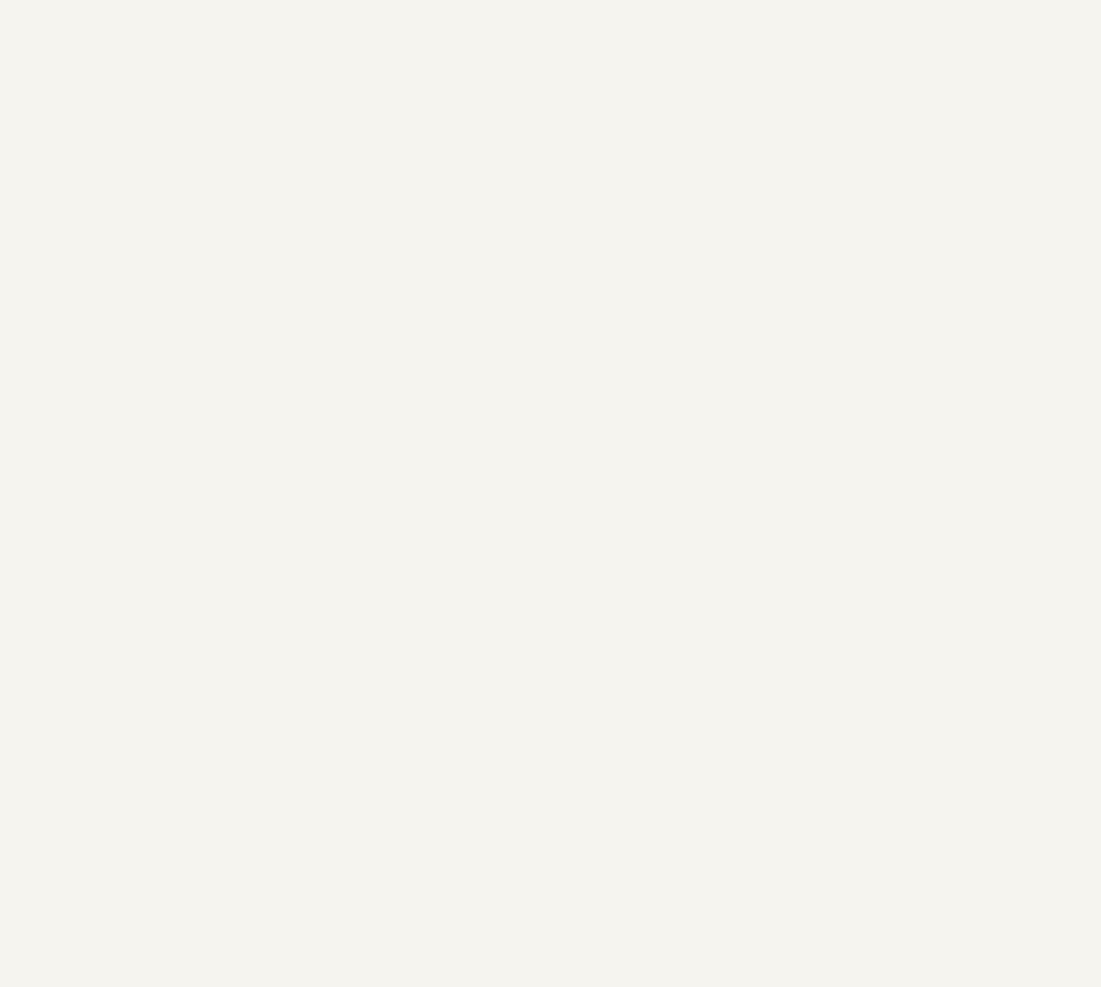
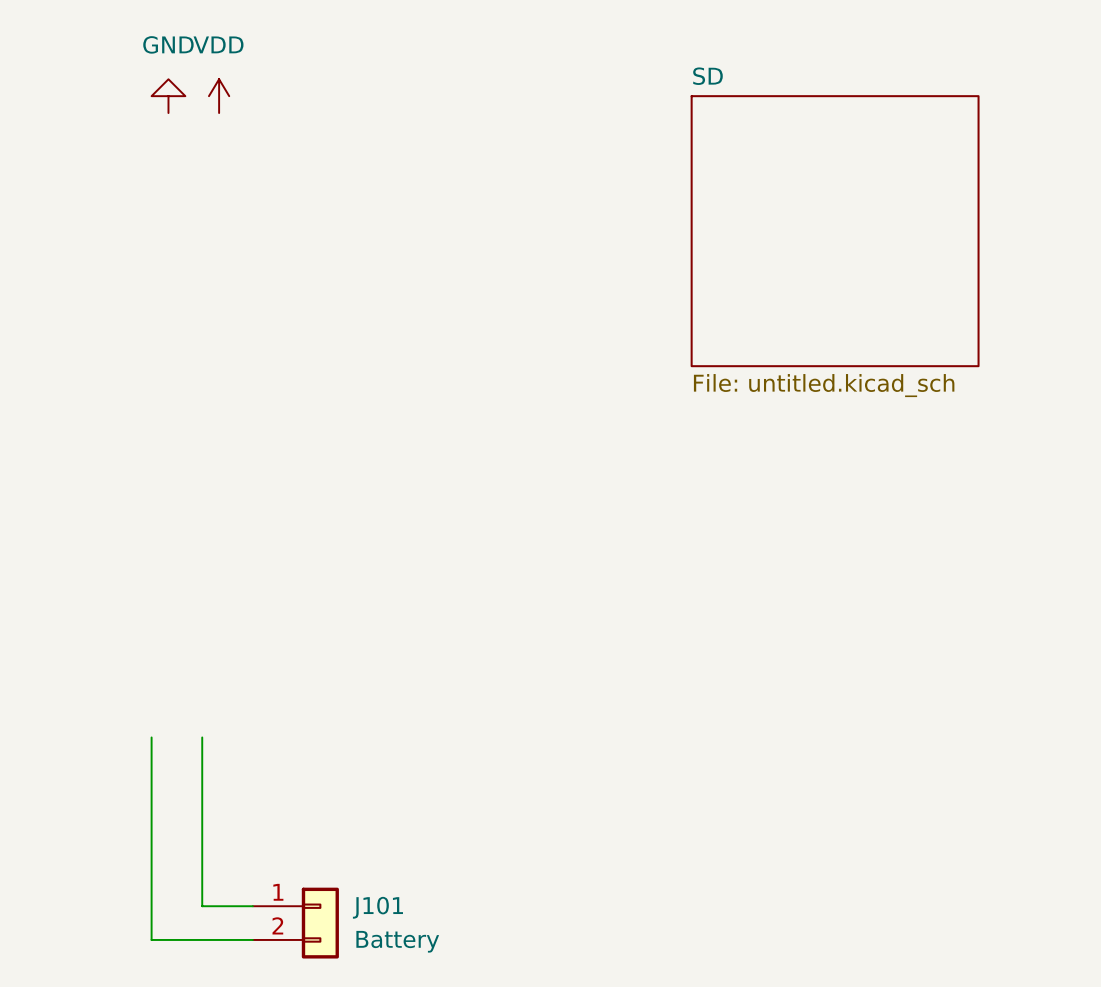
power symbol: none -> GND (168, 96)
power symbol: none -> VDD (219, 96)
sheet SD: none -> File: untitled.kicad_sch (835, 231)
wire: none -> (151, 737) (151, 939) (252, 939)
wire: none -> (202, 737) (202, 906) (252, 906)
J101: none -> Battery (295, 923)

